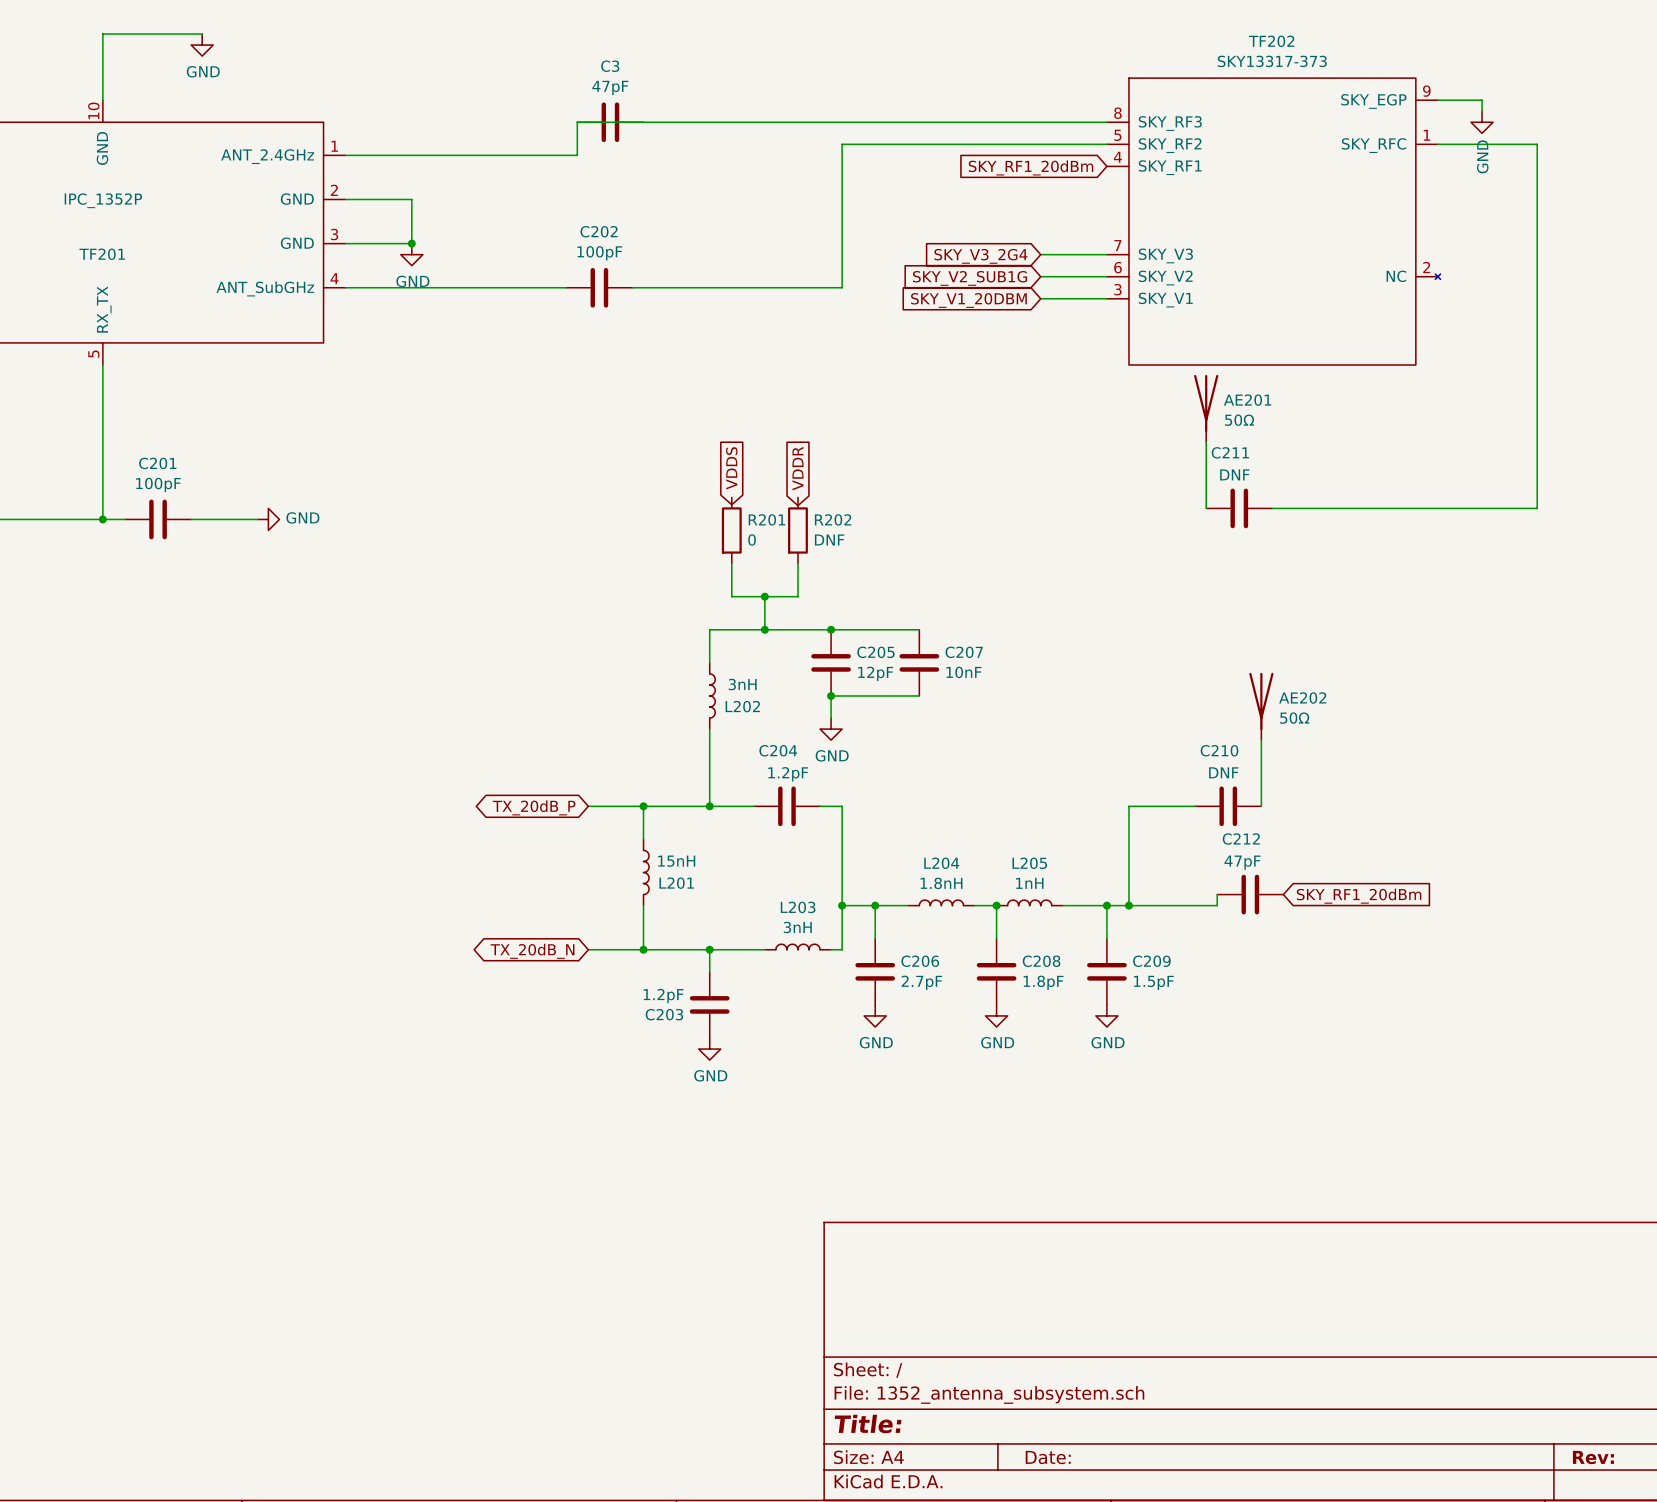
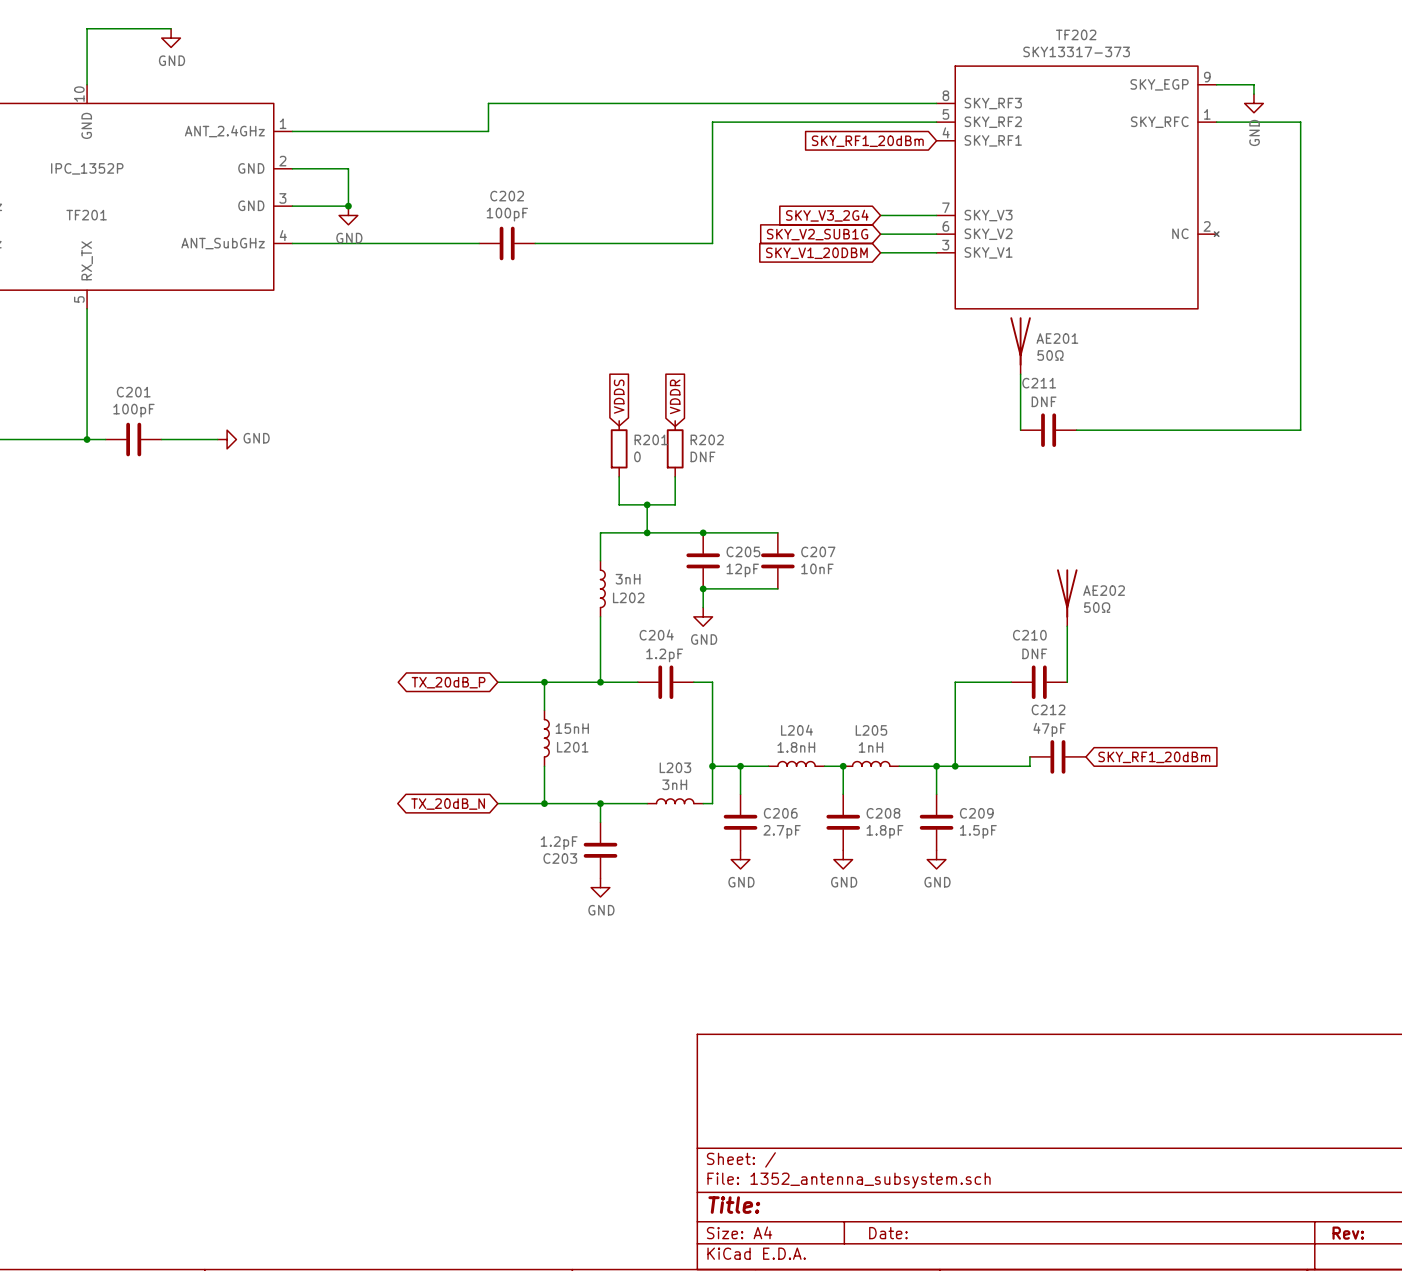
C3: 47pF (610, 122) -> none

